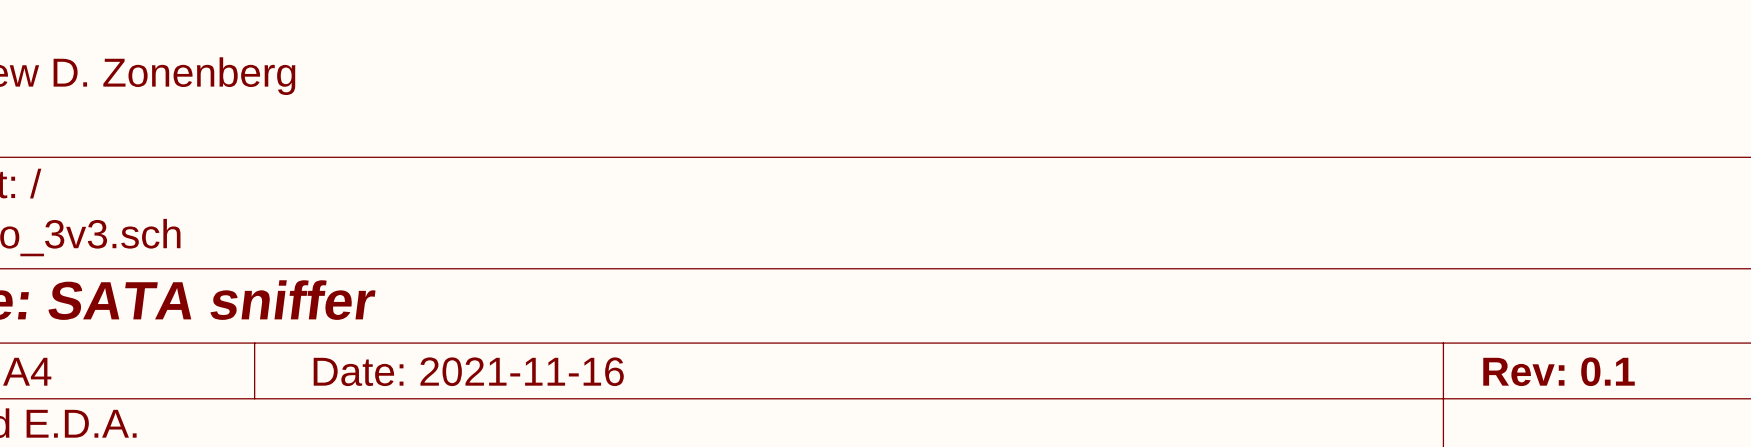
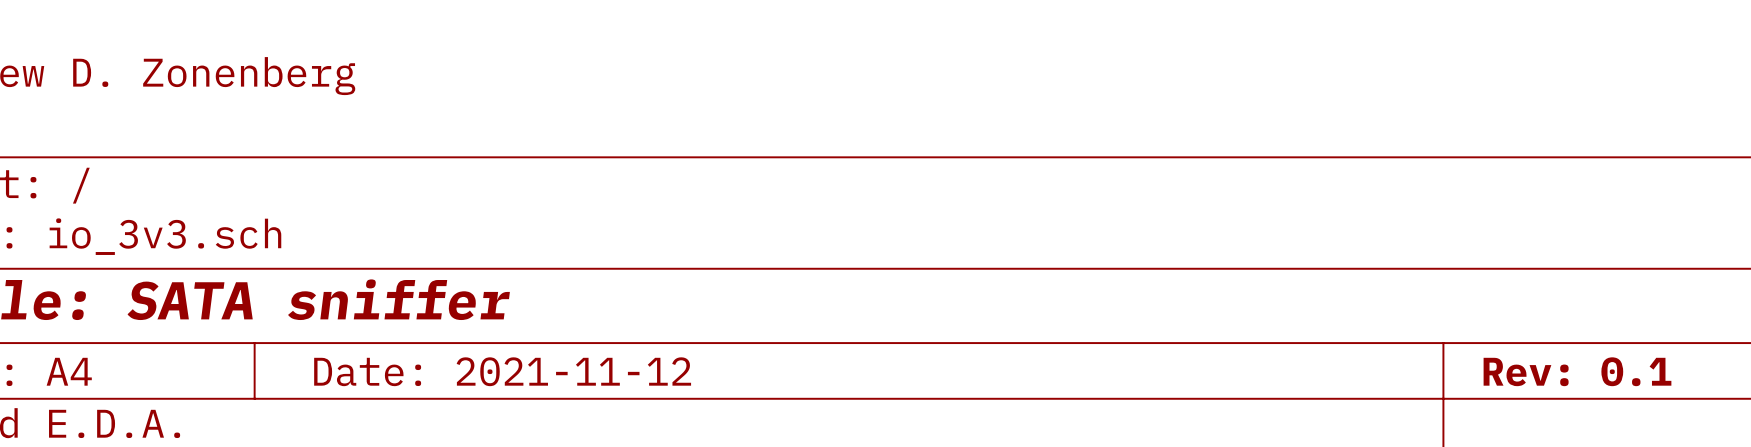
title block: Date: 2021-11-16 (468, 371) -> Date: 2021-11-12 (502, 371)

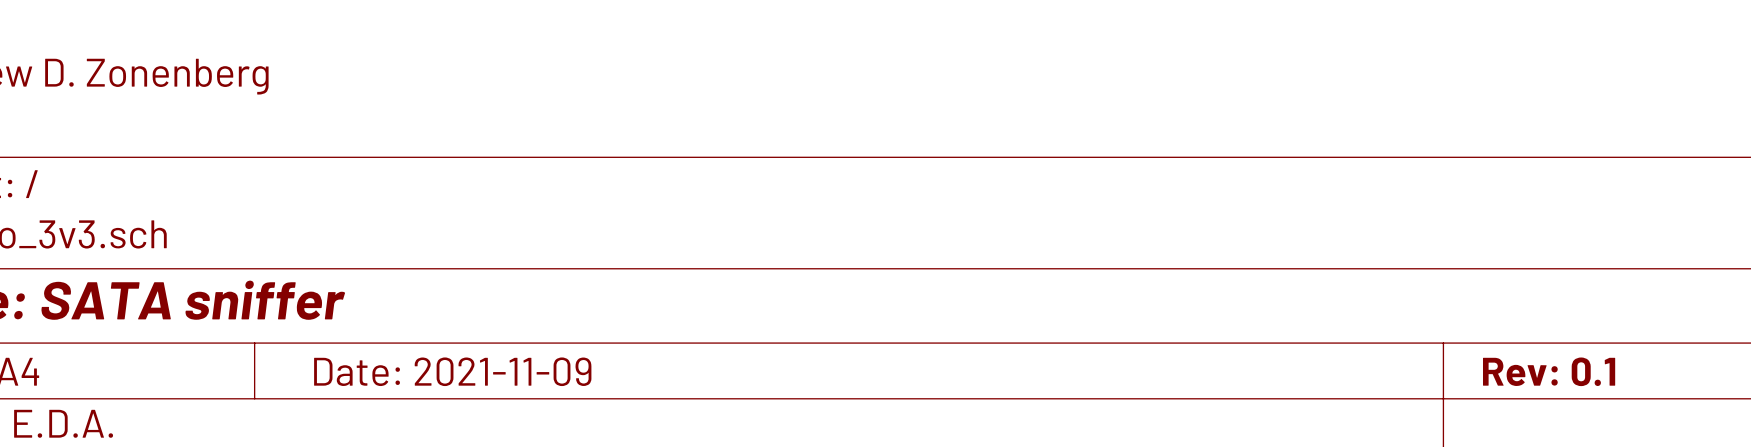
title block: Date: 2021-11-12 (502, 371) -> Date: 2021-11-09 (452, 371)

